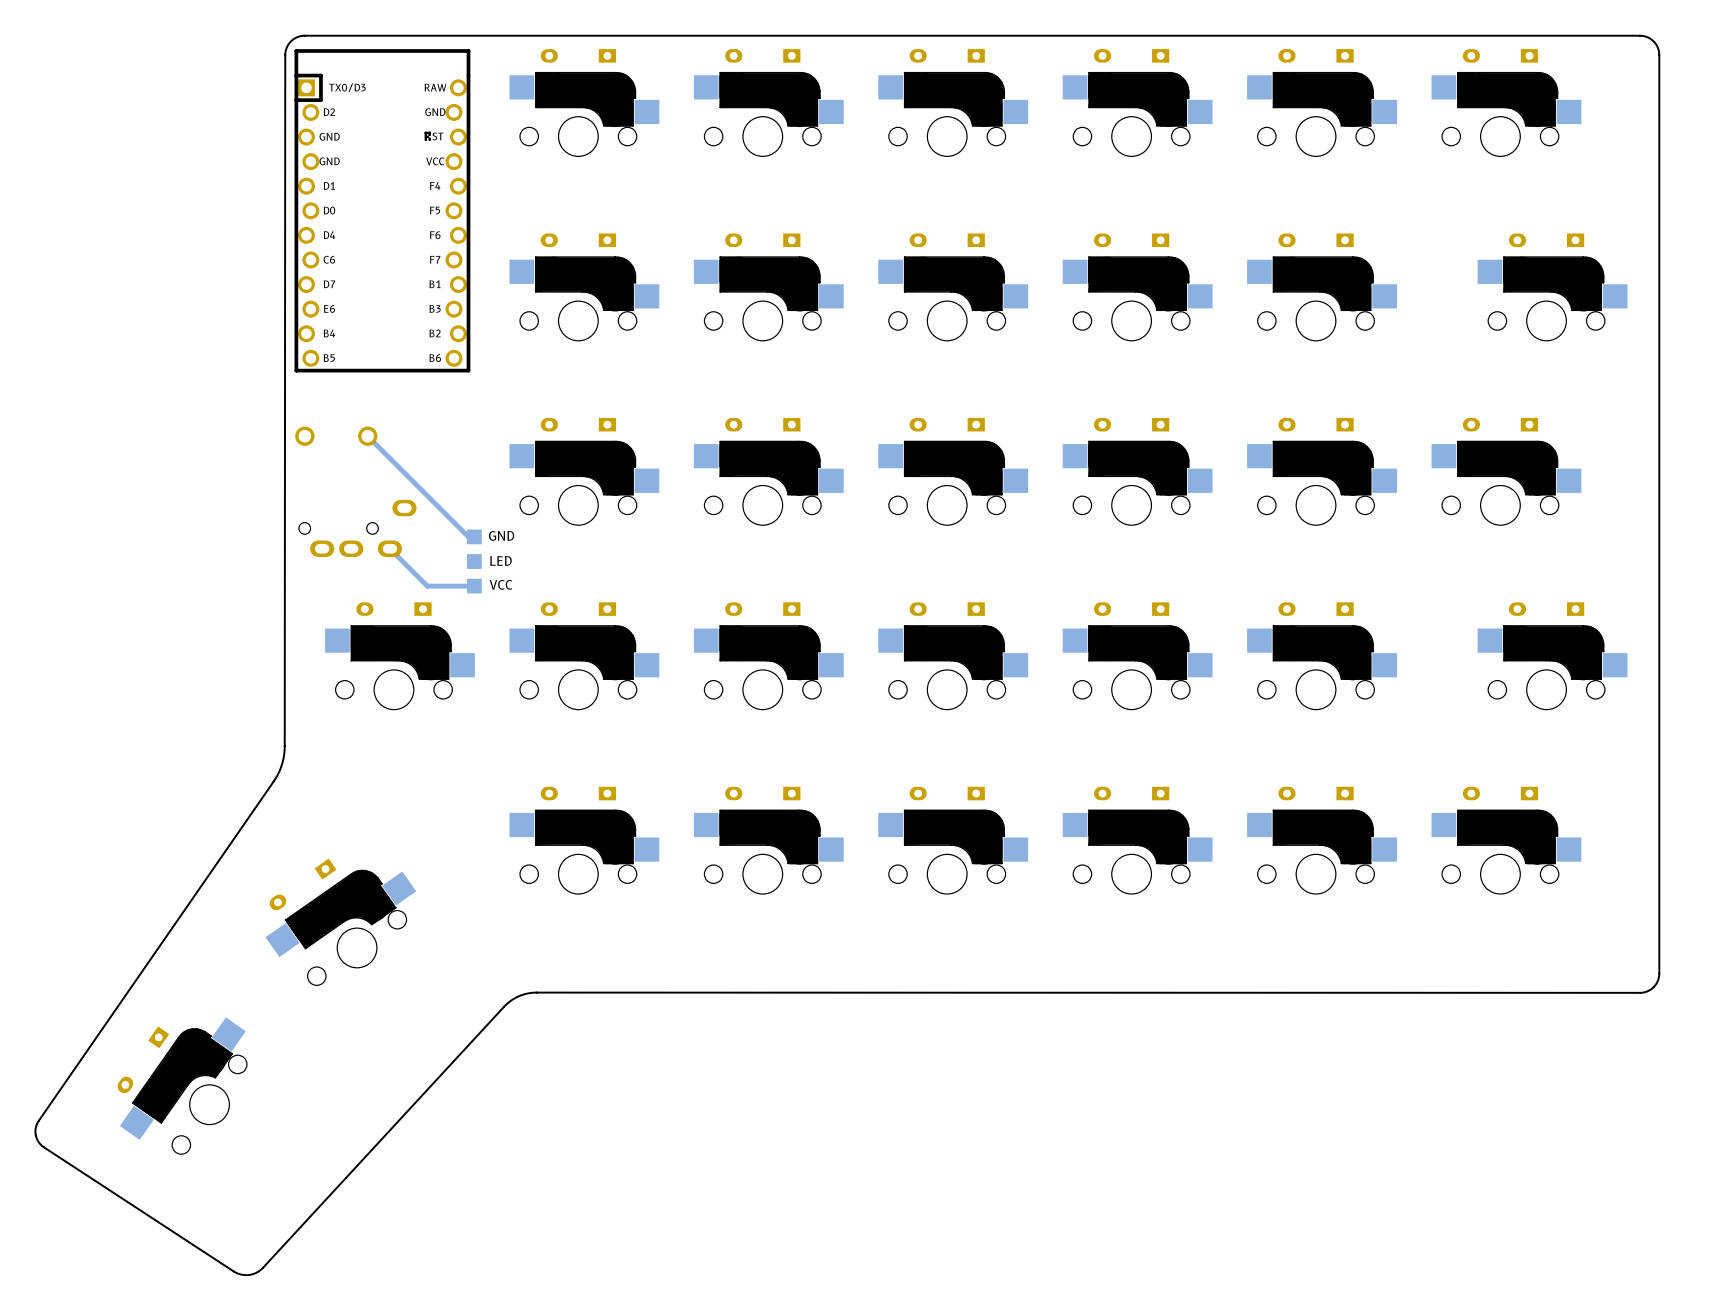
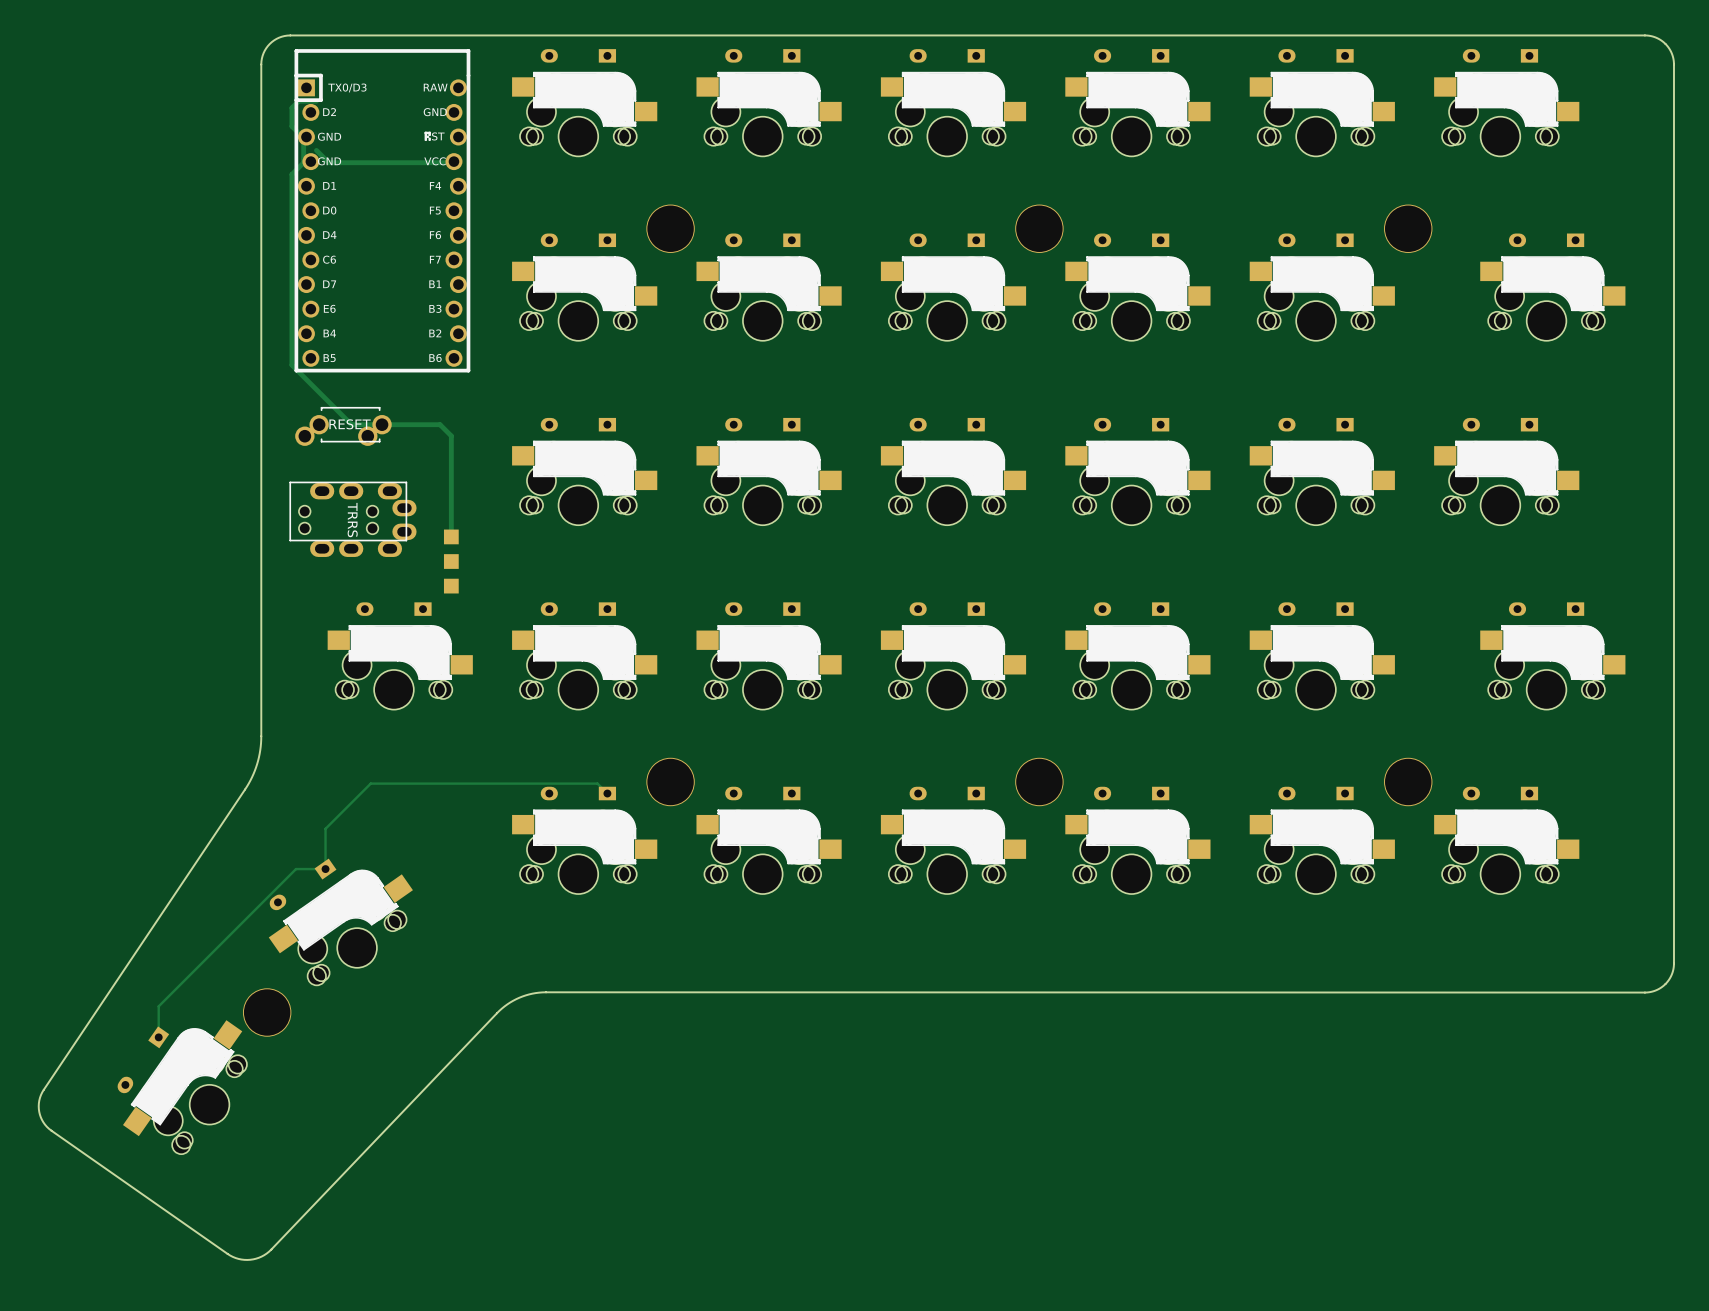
board edge: (1639, 35) (304, 35) (293, 39) (287, 45) (285, 55) (284, 746) (283, 760) (273, 781) (38, 1121) (35, 1132) (38, 1142) (233, 1271) (249, 1274) (263, 1267) (505, 1005) (514, 998) (527, 993) (1639, 992) (1650, 989) (1657, 982) (1659, 973) (1659, 55) (1653, 41) (1639, 35) -> (1644, 35) (1656, 37) (1665, 43) (1671, 53) (1673, 64) (1673, 963) (1670, 977) (1661, 987) (1644, 992) (532, 993) (513, 1000) (499, 1010) (271, 1249) (261, 1256) (250, 1259) (238, 1258) (227, 1253) (51, 1130) (43, 1122) (38, 1106) (42, 1092) (245, 789) (253, 773) (258, 757) (261, 736) (261, 64) (264, 50) (274, 40) (290, 35) (1644, 35)
part footprint: [509, 71, 660, 157] -> [512, 71, 658, 157]
part footprint: [693, 71, 844, 157] -> [696, 71, 842, 157]
part footprint: [878, 71, 1029, 157] -> [880, 71, 1027, 157]
part footprint: [1062, 71, 1213, 157] -> [1065, 71, 1211, 157]
part footprint: [1247, 71, 1397, 157] -> [1249, 71, 1395, 157]
part footprint: [1431, 71, 1582, 157] -> [1434, 71, 1580, 157]
track: none -> (316, 101) (298, 101) (291, 107) (291, 126) (303, 138) (303, 162) (291, 174) (291, 365) (351, 424) (440, 424) (451, 435) (451, 536)
track: none -> (316, 150) (328, 162) (451, 162)
part: none -> (670, 228)
part: none -> (1039, 228)
part: none -> (1408, 228)
part footprint: [509, 256, 660, 341] -> [512, 256, 658, 341]
part footprint: [693, 256, 844, 341] -> [696, 256, 842, 341]
part footprint: [878, 256, 1029, 341] -> [880, 256, 1027, 341]
part footprint: [1062, 256, 1213, 341] -> [1065, 256, 1211, 341]
part footprint: [1247, 256, 1397, 341] -> [1249, 256, 1395, 341]
part footprint: [1477, 256, 1628, 341] -> [1480, 256, 1626, 341]
part: none -> (350, 424)
track: (367, 436) (468, 536) (474, 536) -> none
part footprint: [509, 440, 660, 526] -> [512, 440, 658, 526]
part footprint: [693, 440, 844, 526] -> [696, 440, 842, 526]
part footprint: [878, 440, 1029, 526] -> [880, 440, 1027, 526]
part footprint: [1062, 440, 1213, 526] -> [1065, 440, 1211, 526]
part footprint: [1247, 440, 1397, 526] -> [1249, 440, 1395, 526]
part footprint: [1431, 440, 1582, 526] -> [1434, 440, 1580, 526]
part: none -> (353, 519)
part: (357, 528) -> none
track: (389, 548) (427, 586) (474, 586) -> none
part: none -> (451, 561)
part: (474, 561) -> none
part footprint: [325, 625, 475, 710] -> [327, 625, 473, 710]
part footprint: [509, 625, 660, 710] -> [512, 625, 658, 710]
part footprint: [693, 625, 844, 710] -> [696, 625, 842, 710]
part footprint: [878, 625, 1029, 710] -> [880, 625, 1027, 710]
part footprint: [1062, 625, 1213, 710] -> [1065, 625, 1211, 710]
part footprint: [1247, 625, 1397, 710] -> [1249, 625, 1395, 710]
part footprint: [1477, 625, 1628, 710] -> [1480, 625, 1626, 710]
part: none -> (670, 781)
part: none -> (1039, 781)
part: none -> (1408, 781)
track: none -> (607, 793) (597, 783) (370, 783) (325, 828) (325, 869) (296, 869) (158, 1006) (158, 1037)
part footprint: [509, 809, 660, 895] -> [512, 809, 658, 895]
part footprint: [693, 809, 844, 895] -> [696, 809, 842, 895]
part footprint: [878, 809, 1029, 895] -> [880, 809, 1027, 895]
part footprint: [1062, 809, 1213, 895] -> [1065, 809, 1211, 895]
part footprint: [1247, 809, 1397, 895] -> [1249, 809, 1395, 895]
part footprint: [1431, 809, 1582, 895] -> [1434, 809, 1580, 895]
part footprint: [265, 869, 417, 986] -> [268, 869, 413, 986]
part: none -> (267, 1012)
part footprint: [119, 1017, 247, 1155] -> [122, 1020, 247, 1155]

